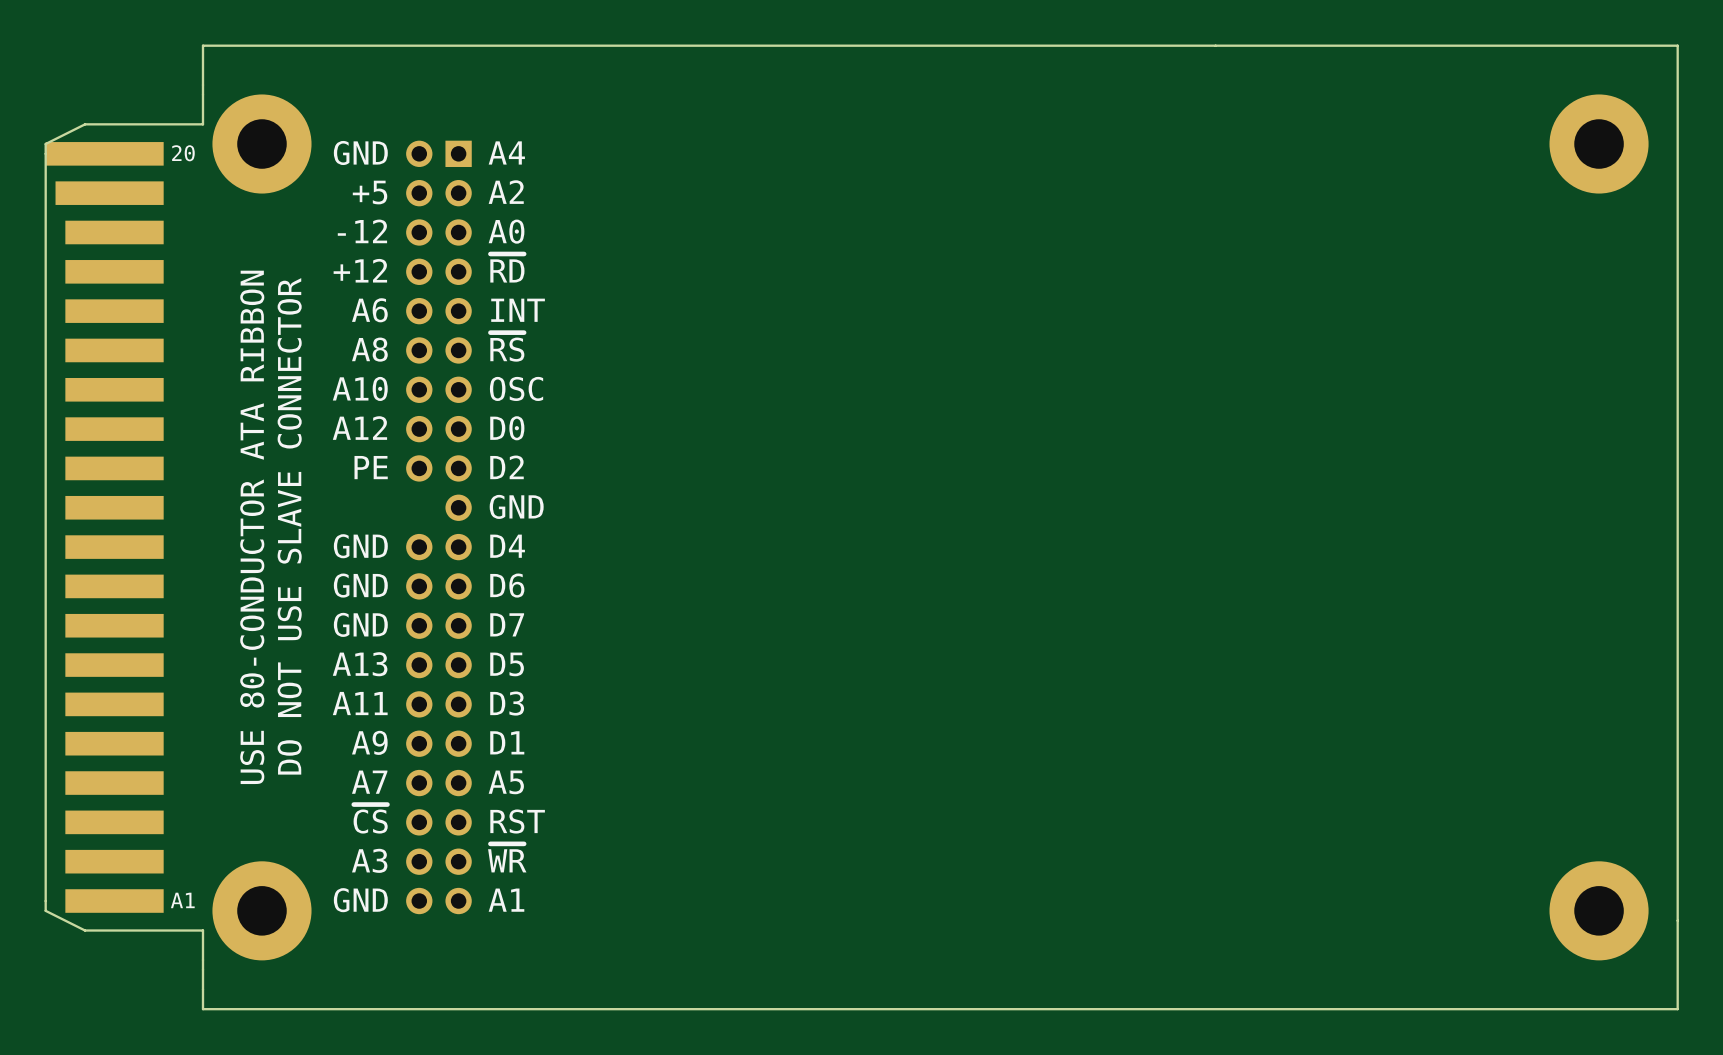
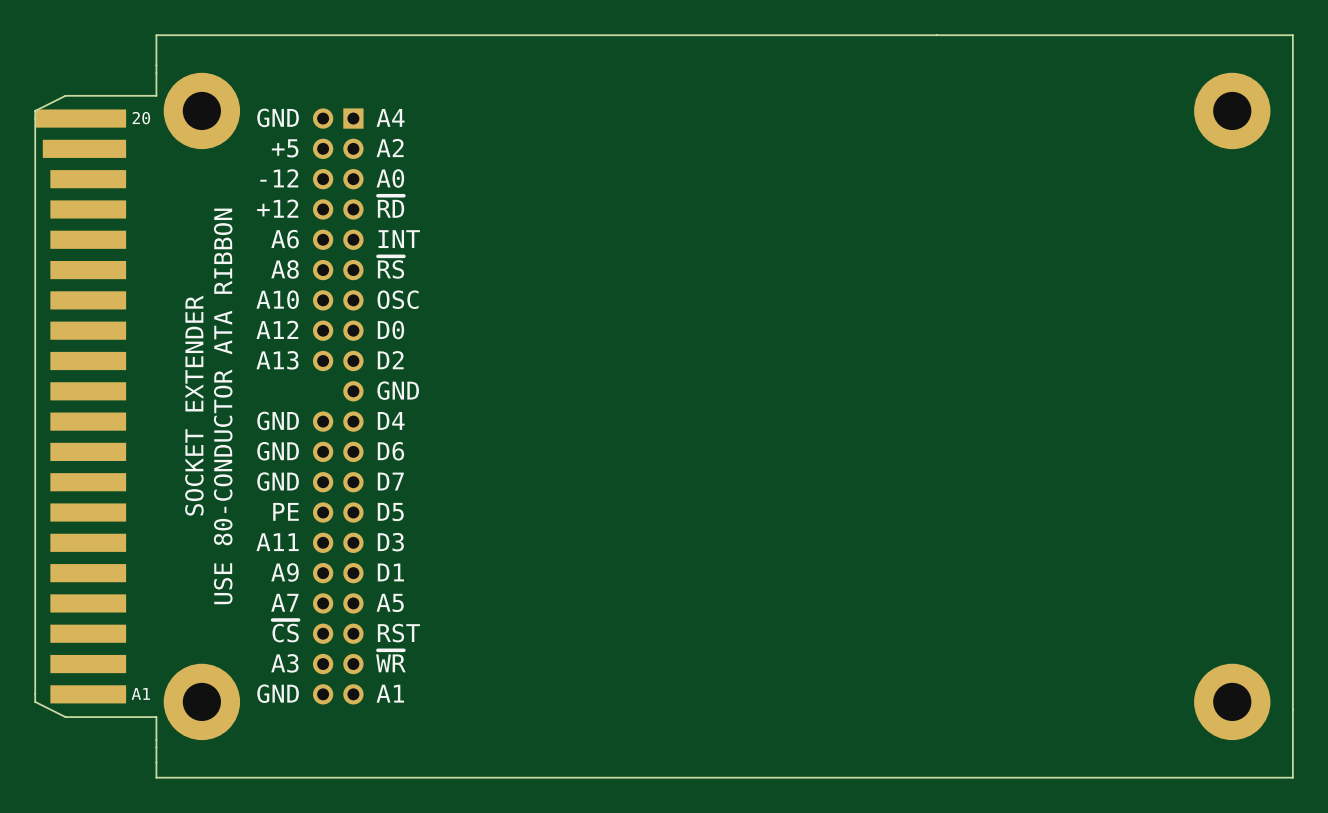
text: PE (371, 467) -> A13 (277, 360)
text: DO NOT USE SLAVE CONNECTOR (289, 526) -> USE 80-CONDUCTOR ATA RIBBON (223, 406)
text: USE 80-CONDUCTOR ATA RIBBON (252, 527) -> SOCKET EXTENDER (194, 405)
text: A13 (360, 664) -> PE (286, 511)

